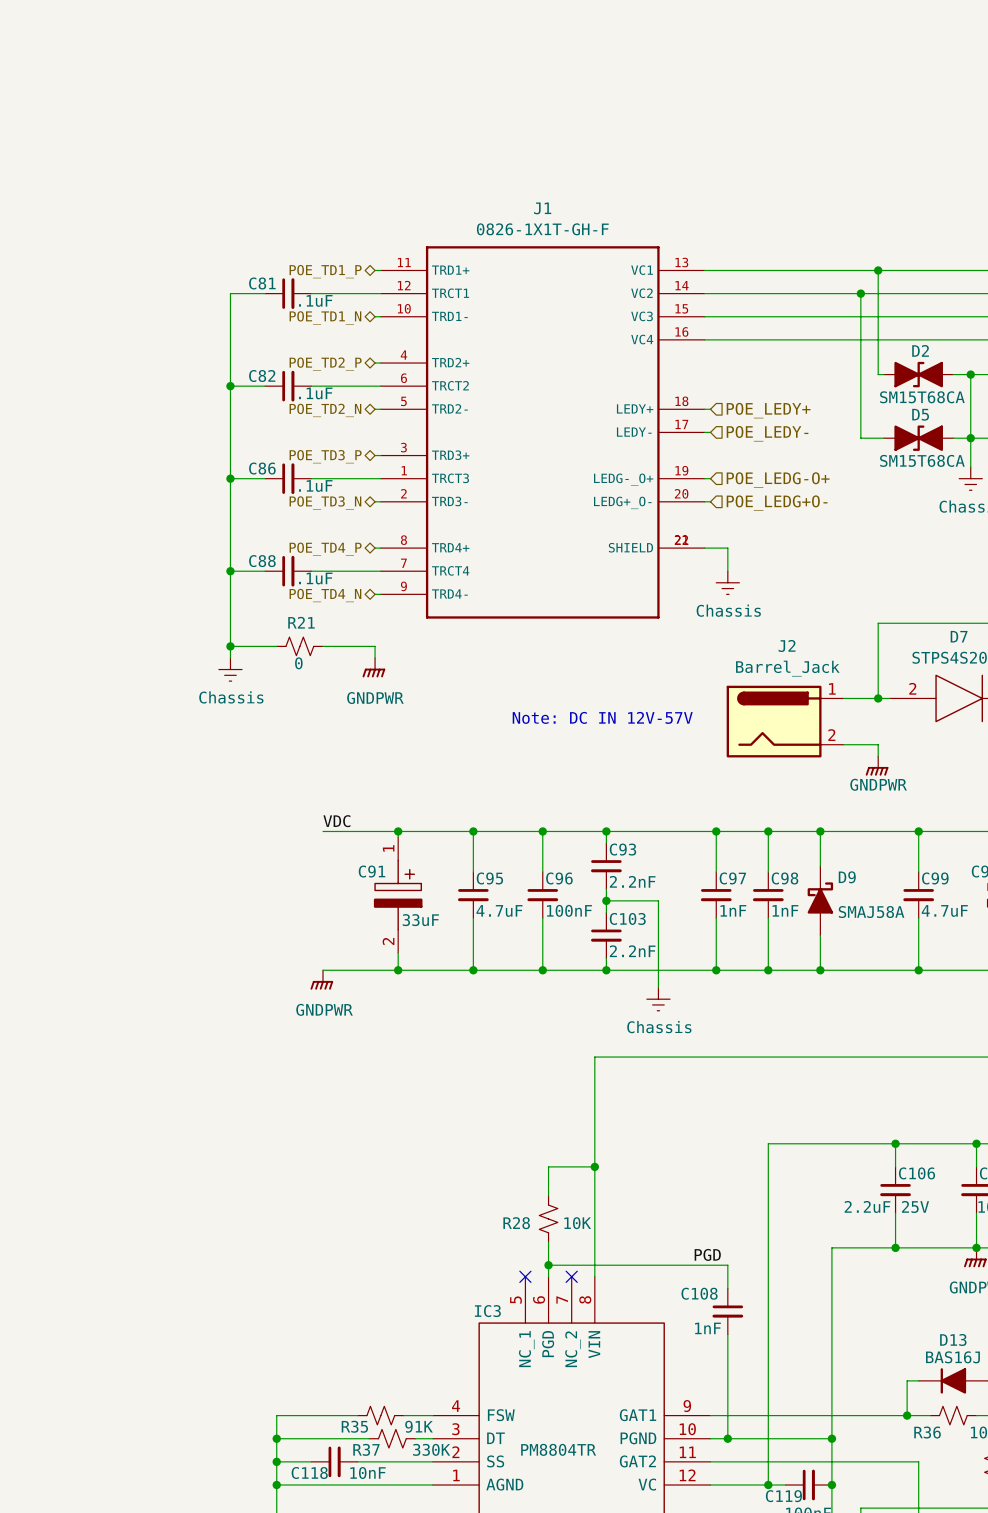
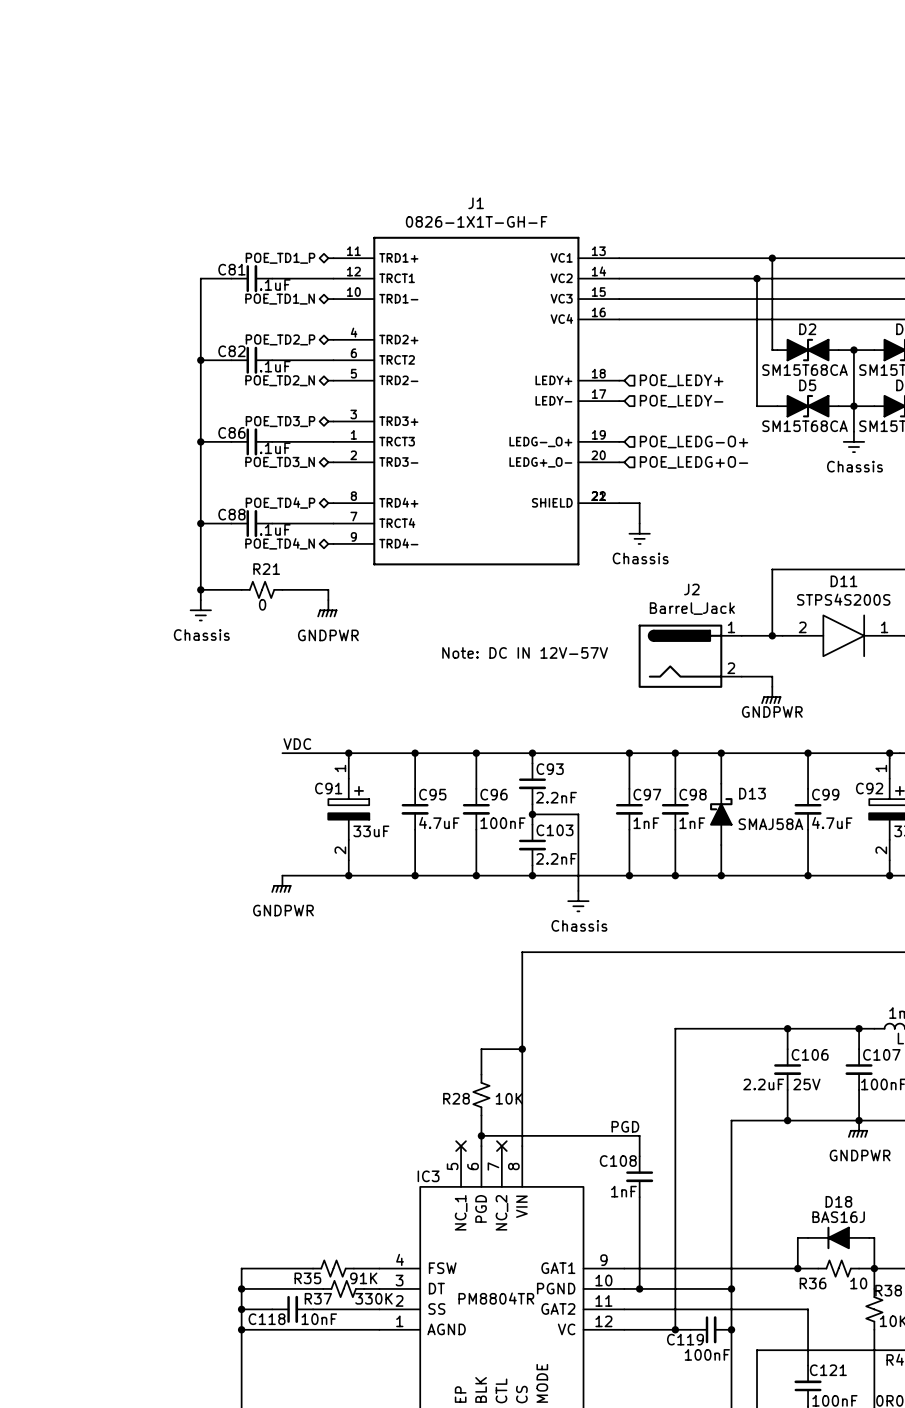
D7 name: D7 (959, 636) -> D11 (844, 581)
D9 name: D9 (847, 877) -> D13 (752, 793)
D13 name: D13 (953, 1339) -> D18 (838, 1201)

